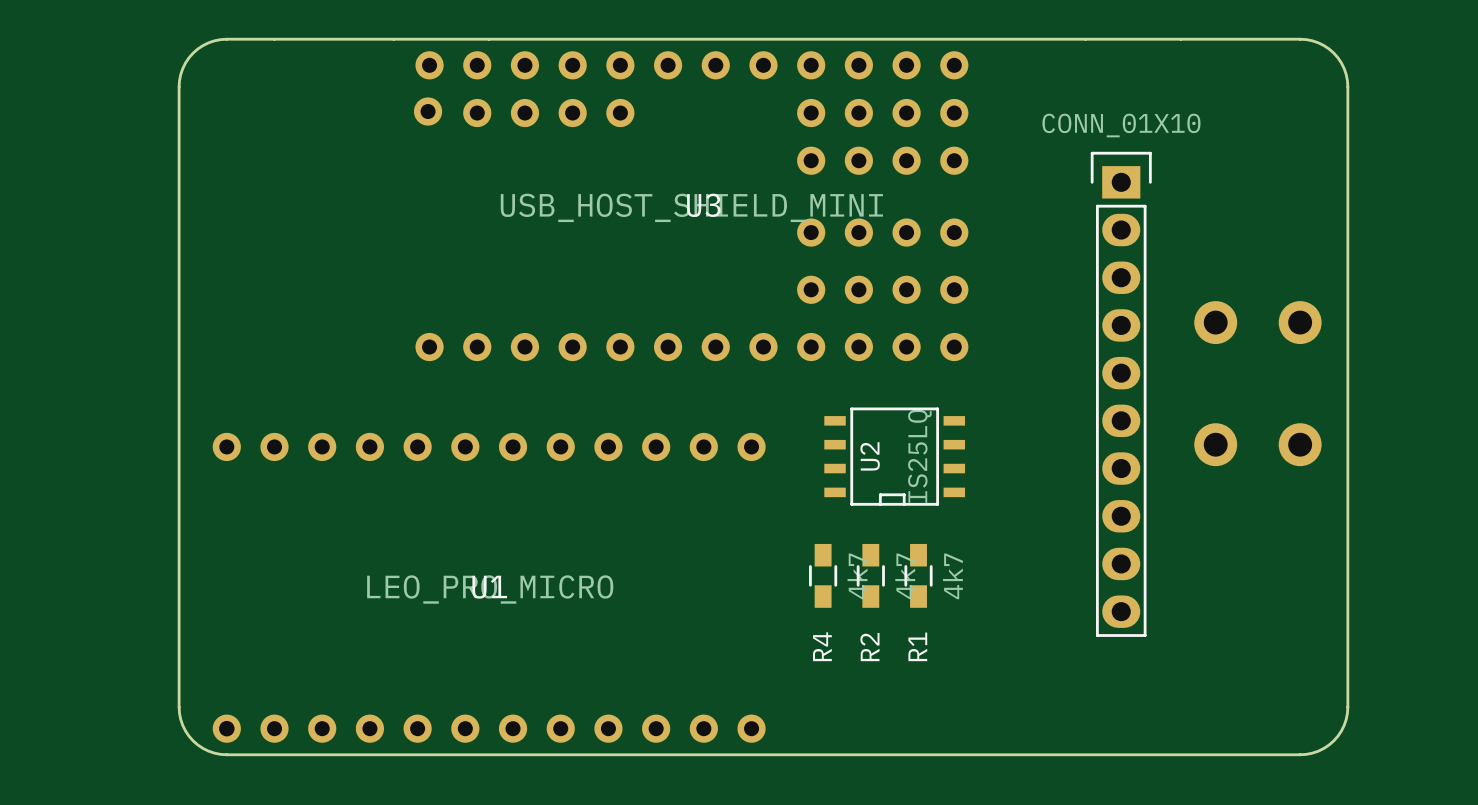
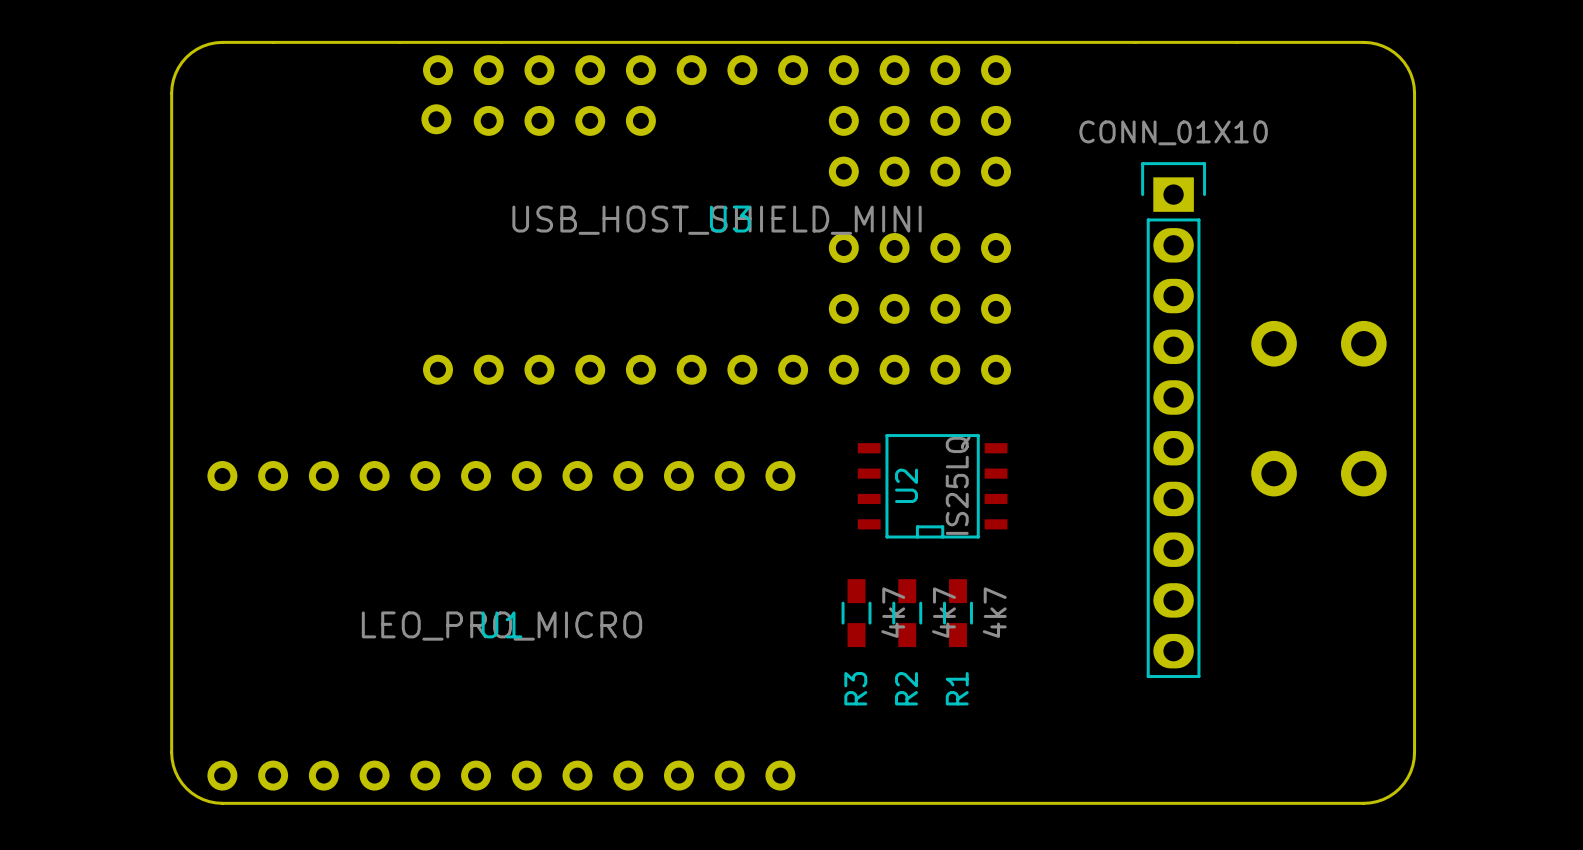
R4 name: R4 (822, 646) -> R3 (855, 688)

